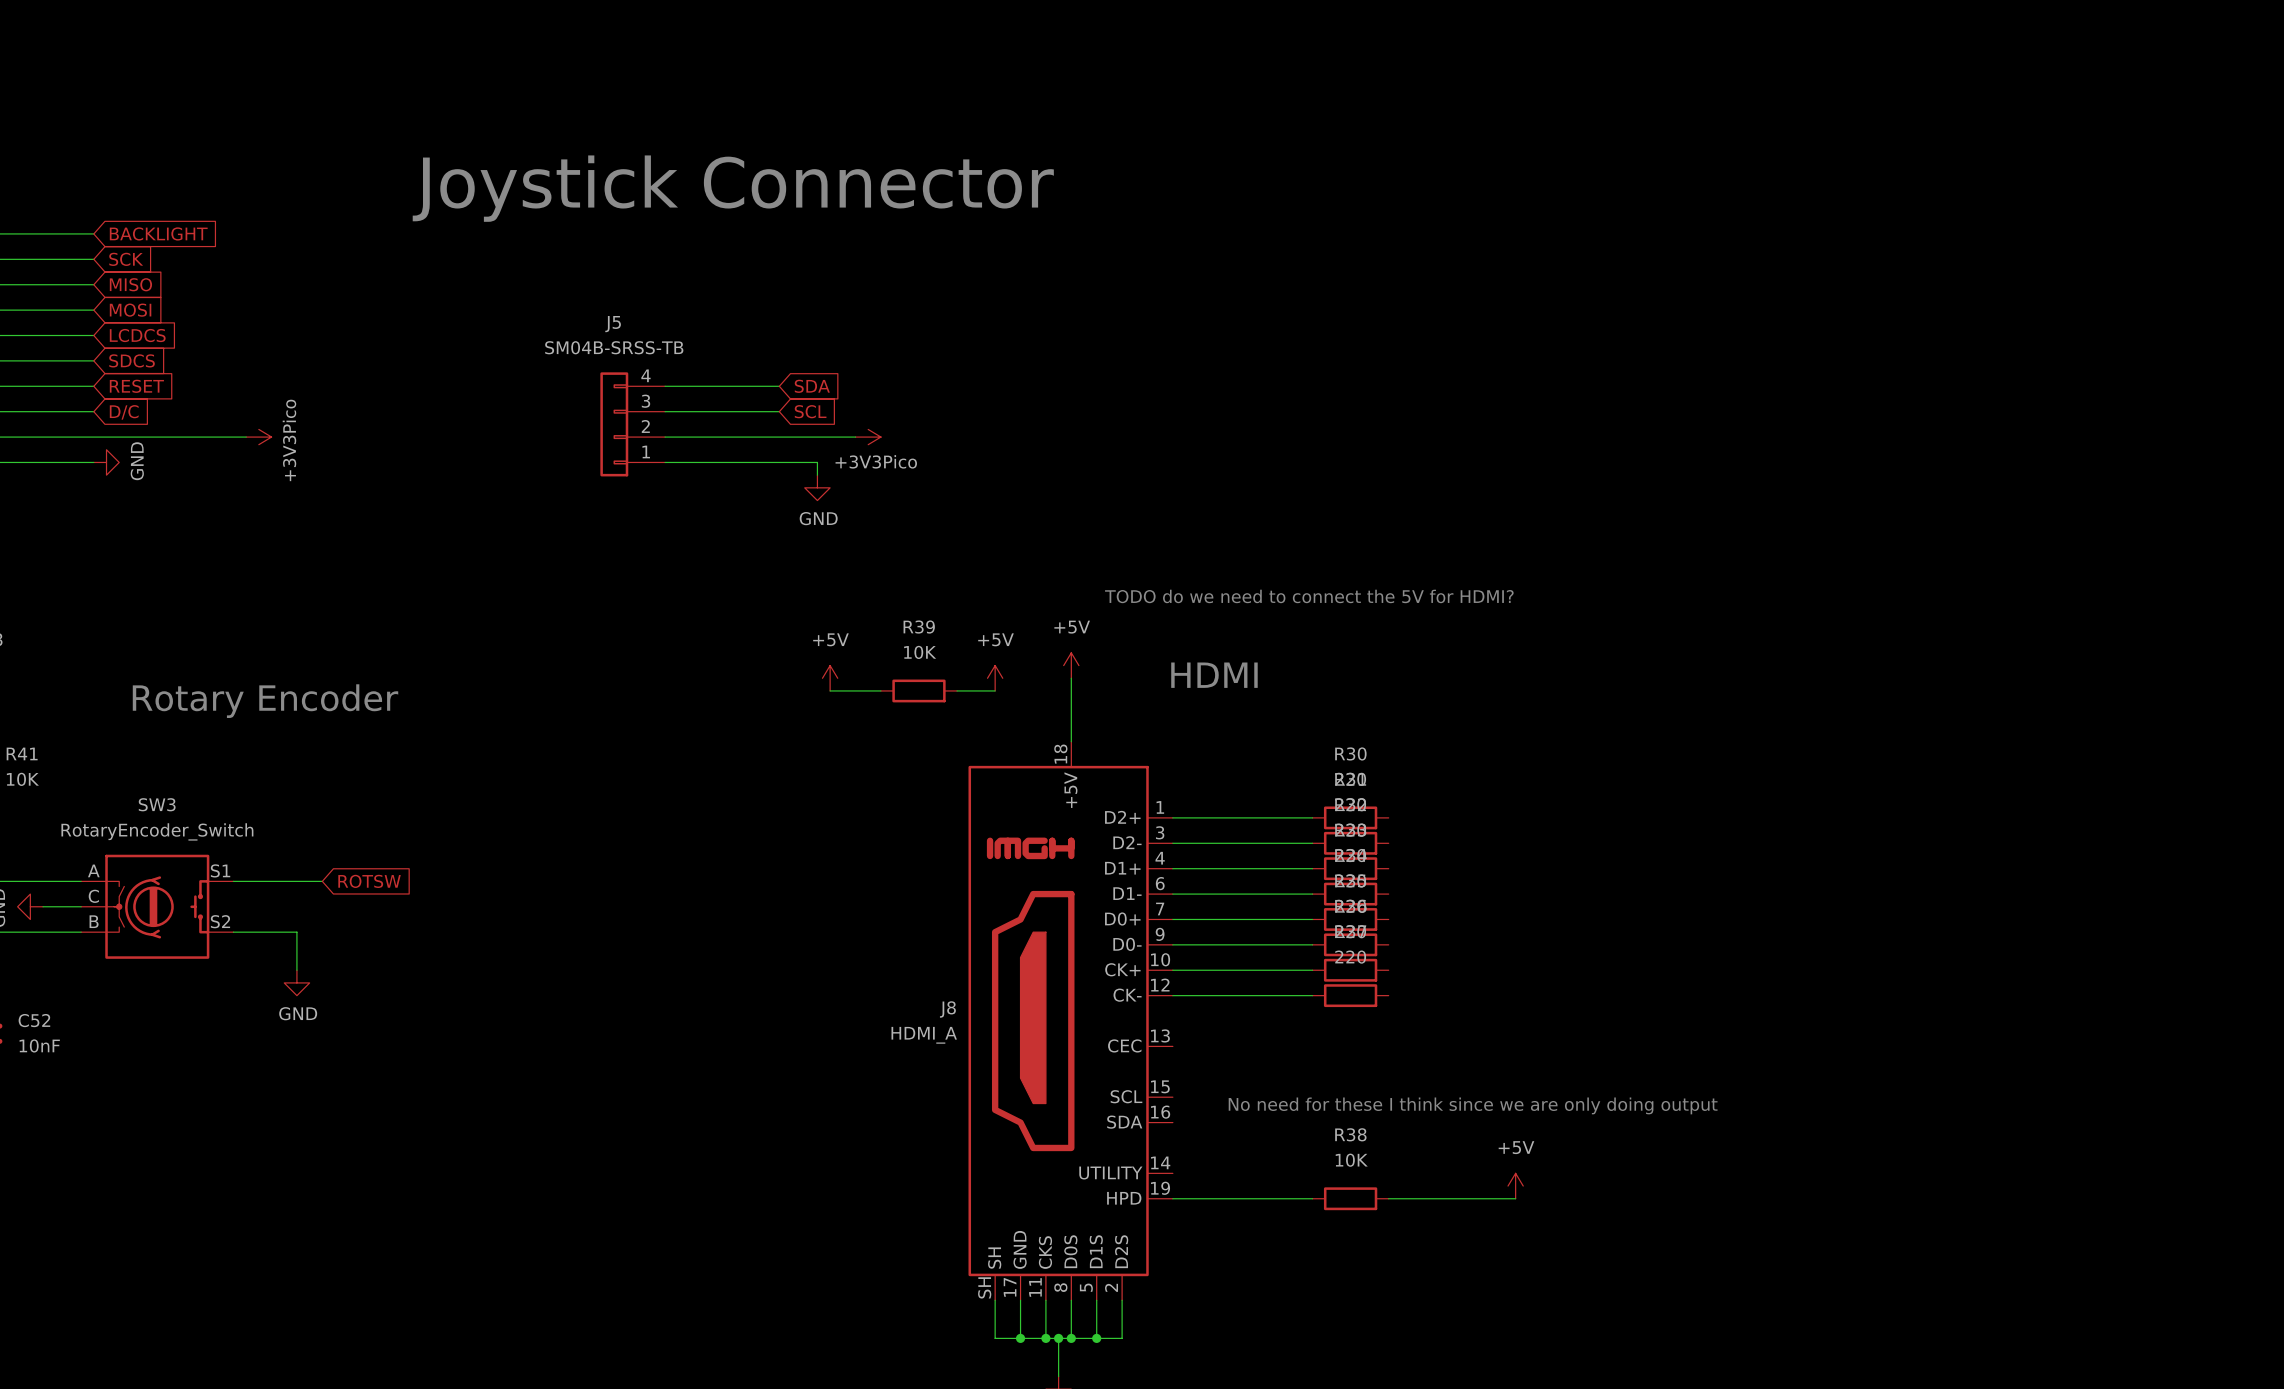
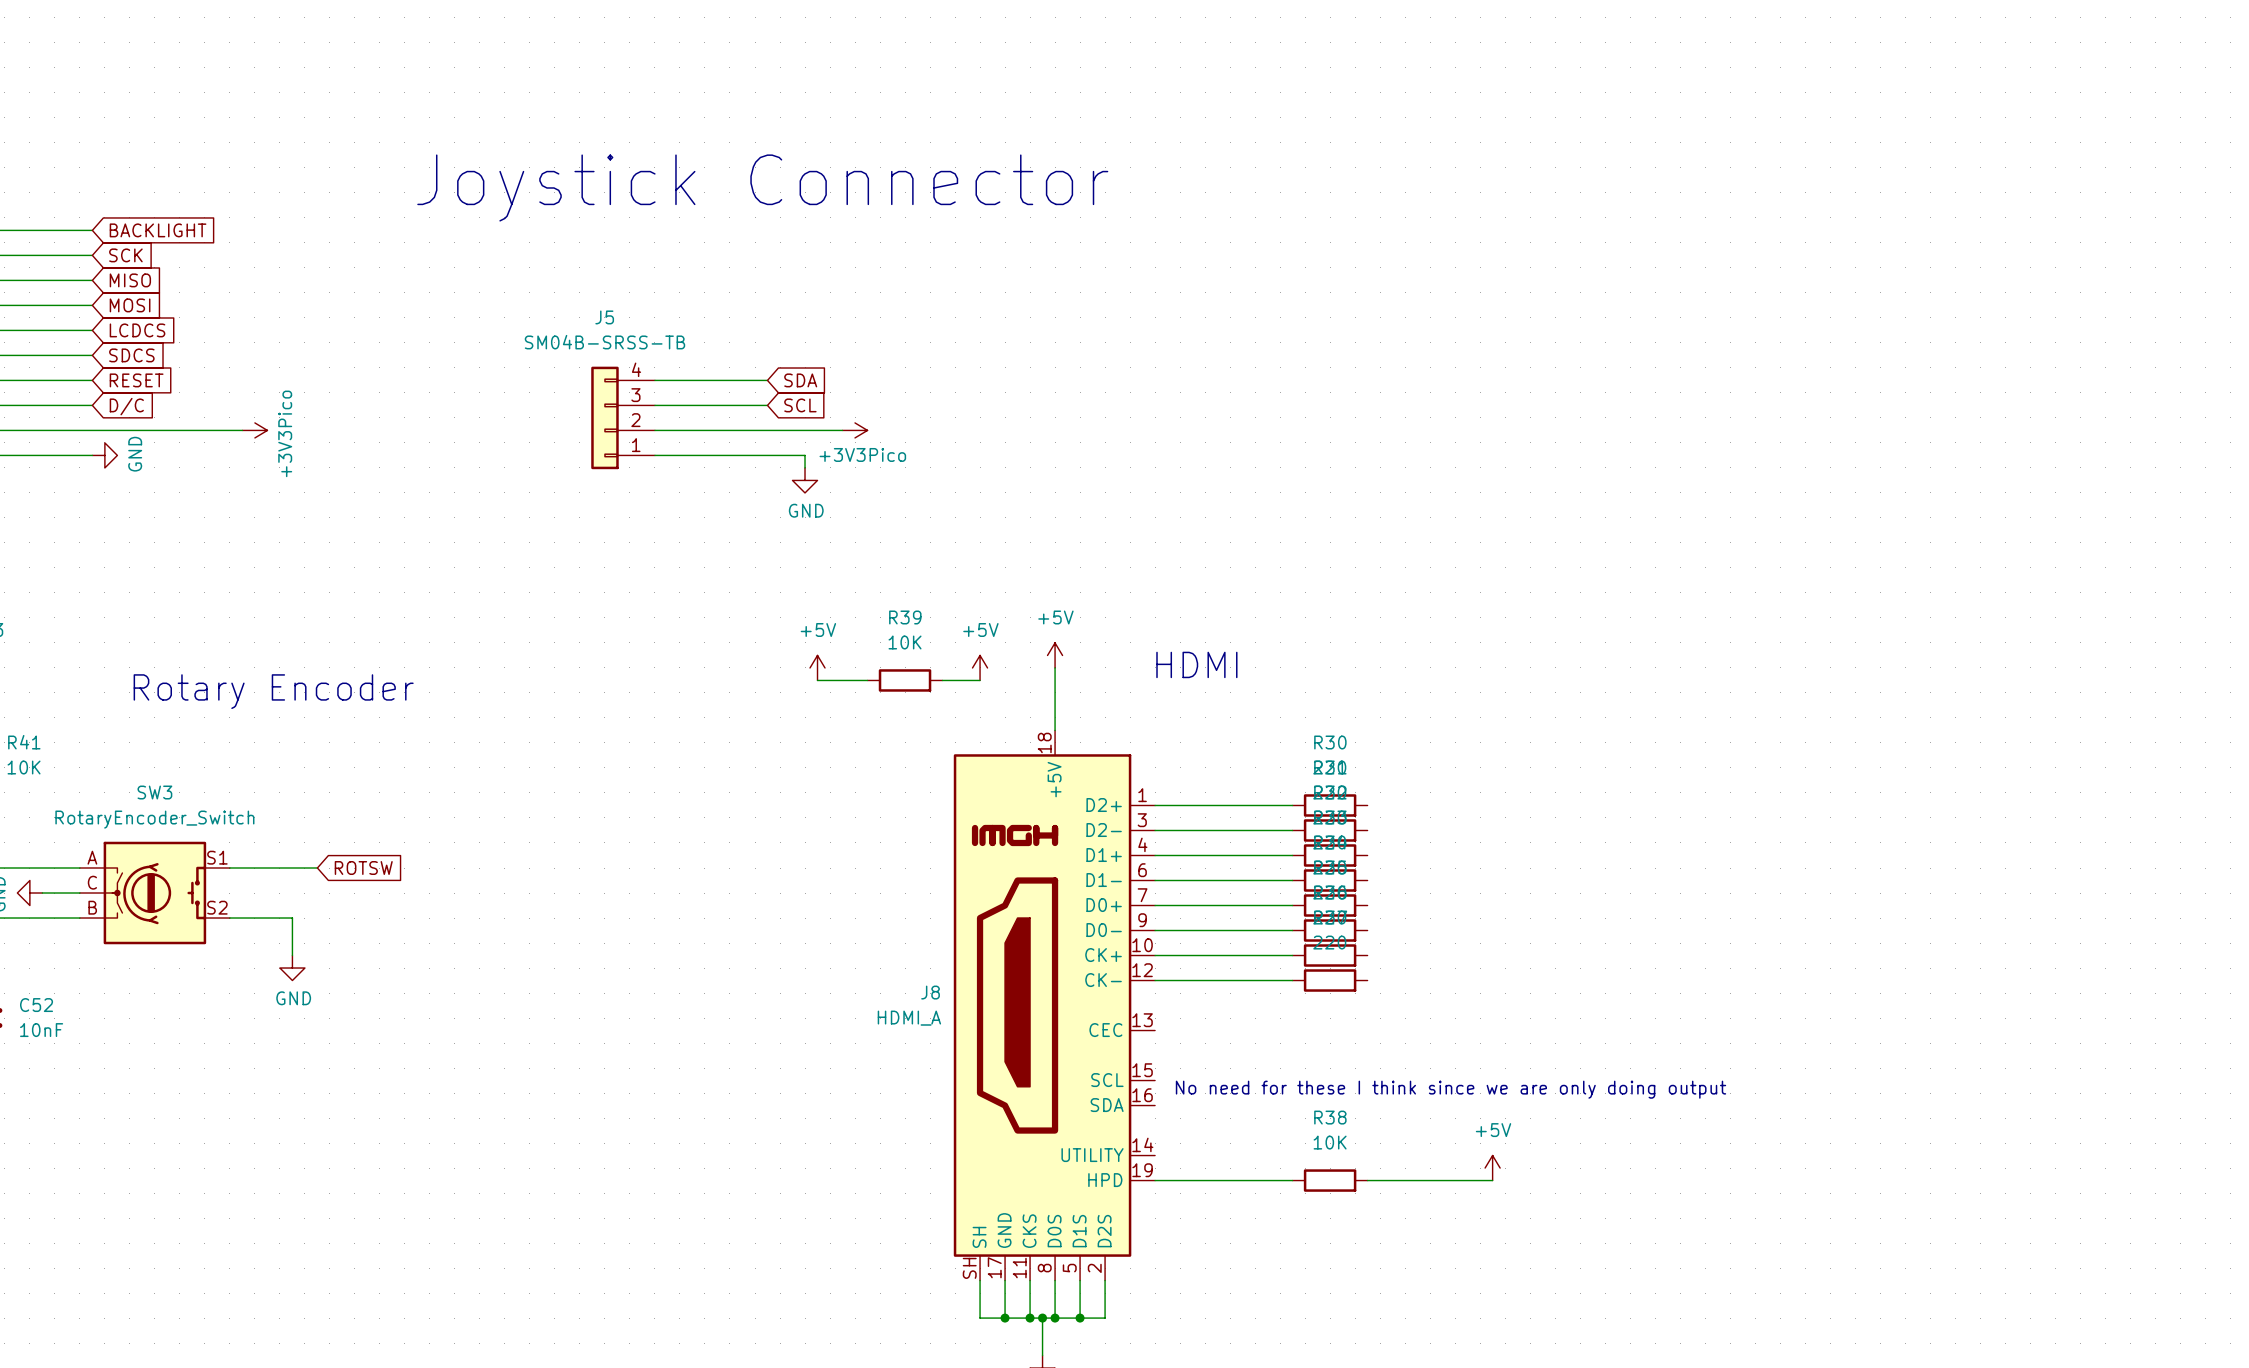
text: TODO do we need to connect the 5V for HDMI? (1309, 596) -> none

